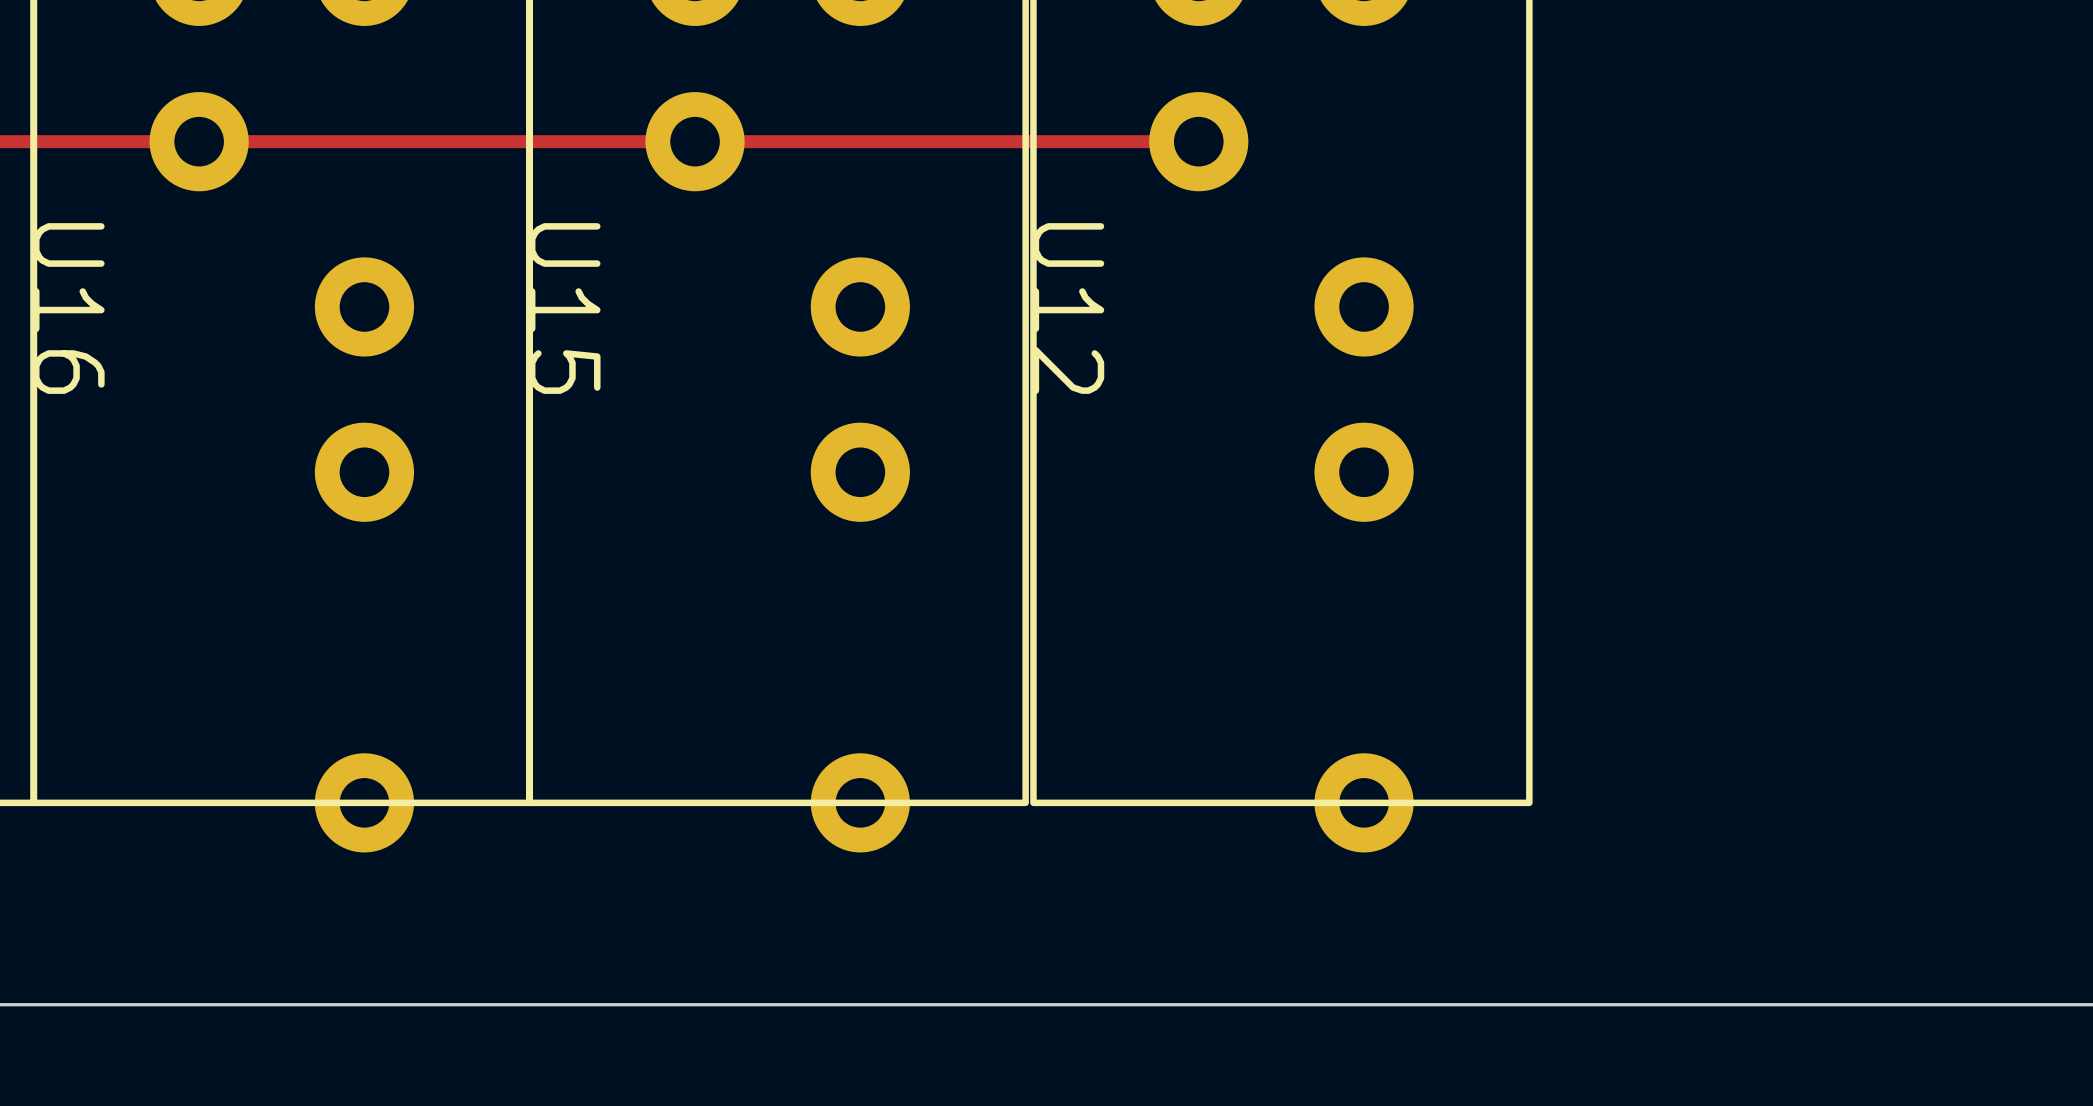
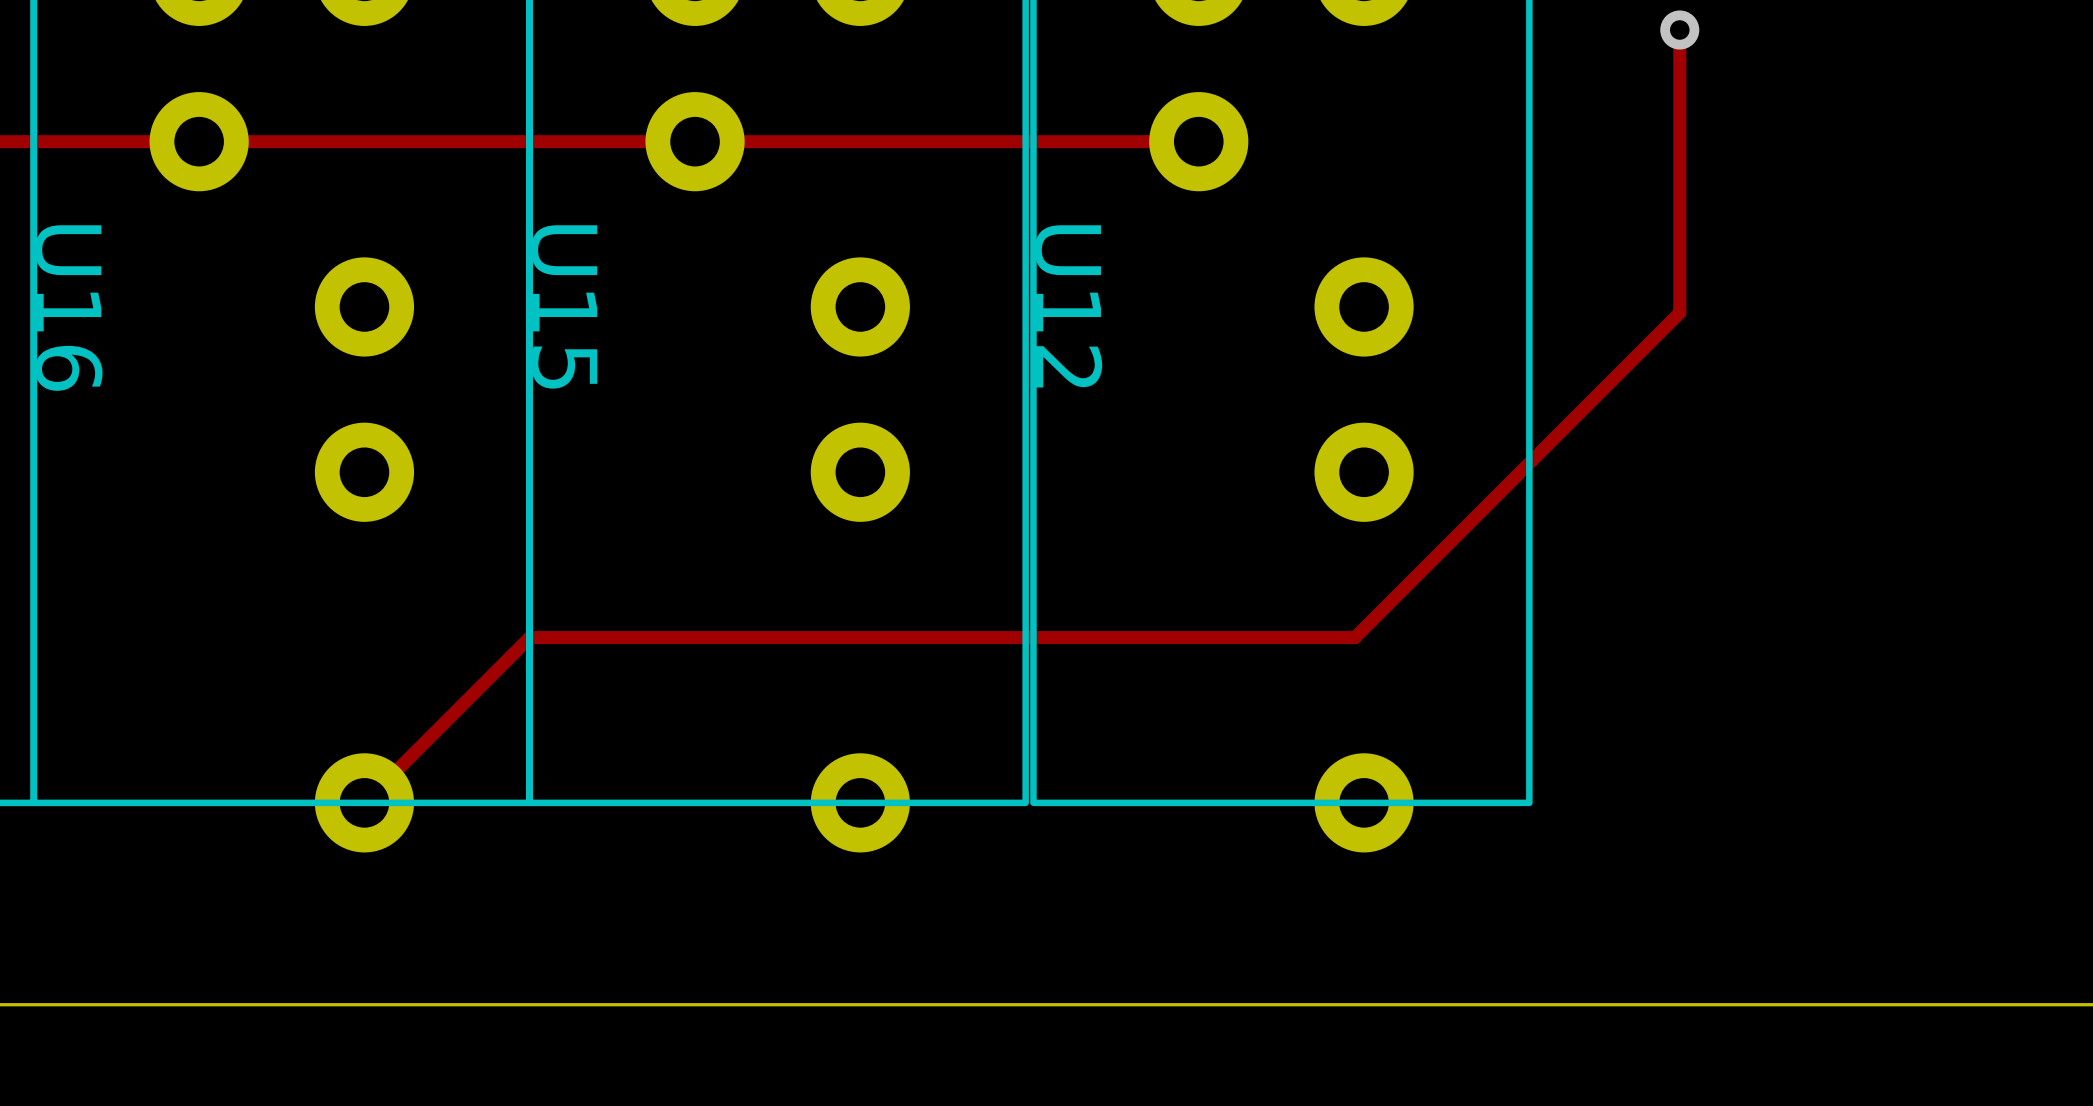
track: none -> (1679, 30) (1679, 312) (1355, 637) (529, 637) (364, 802)
via: none -> (1679, 30)

